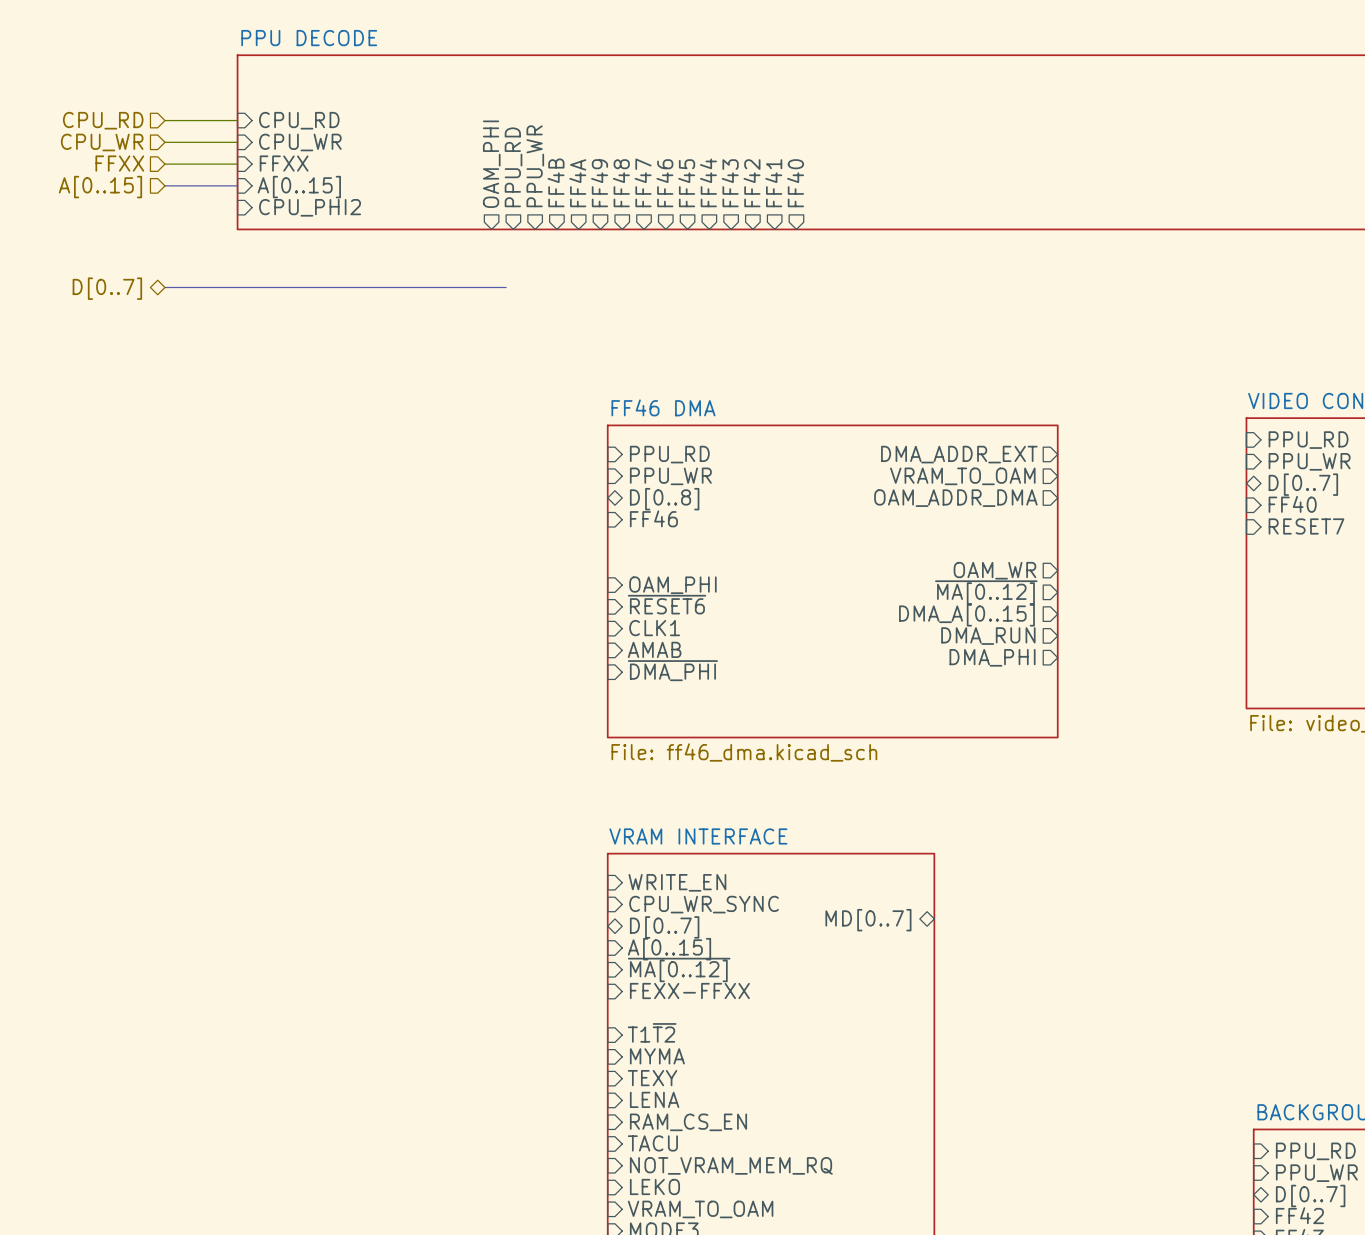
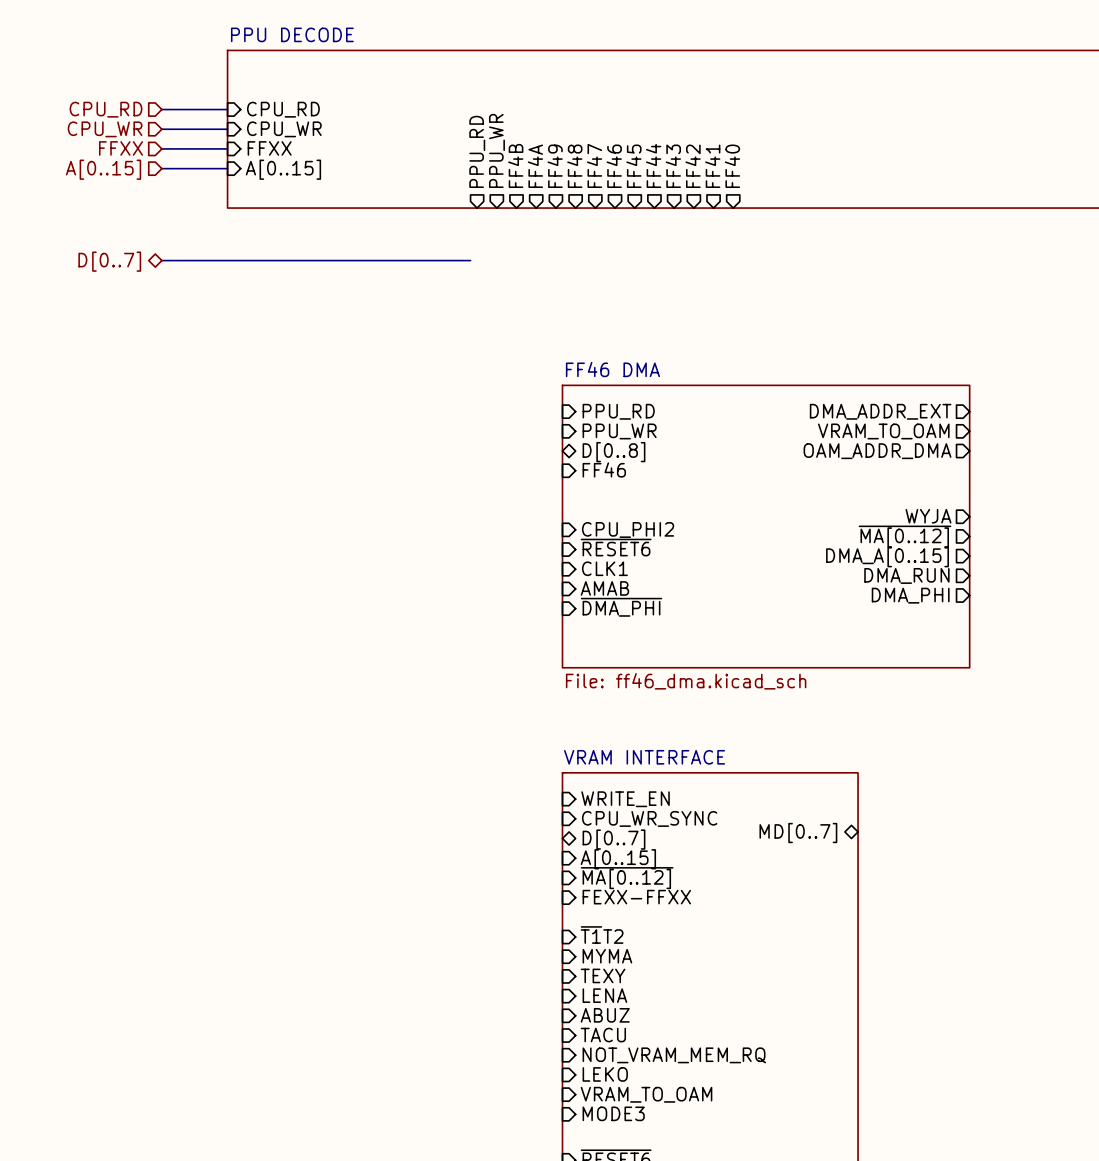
sheet pin: OAM_PHI (491, 164) -> none
sheet pin: CPU_PHI2 (310, 207) -> none
sheet pin: OAM_WR (994, 570) -> WYJA (928, 516)
sheet pin: OAM_PHI (672, 585) -> CPU_PHI2 (628, 529)
sheet pin: T1~{T2} (652, 1032) -> ~{T1}T2 (602, 935)
sheet pin: RAM_CS_EN (688, 1122) -> ABUZ (605, 1015)

